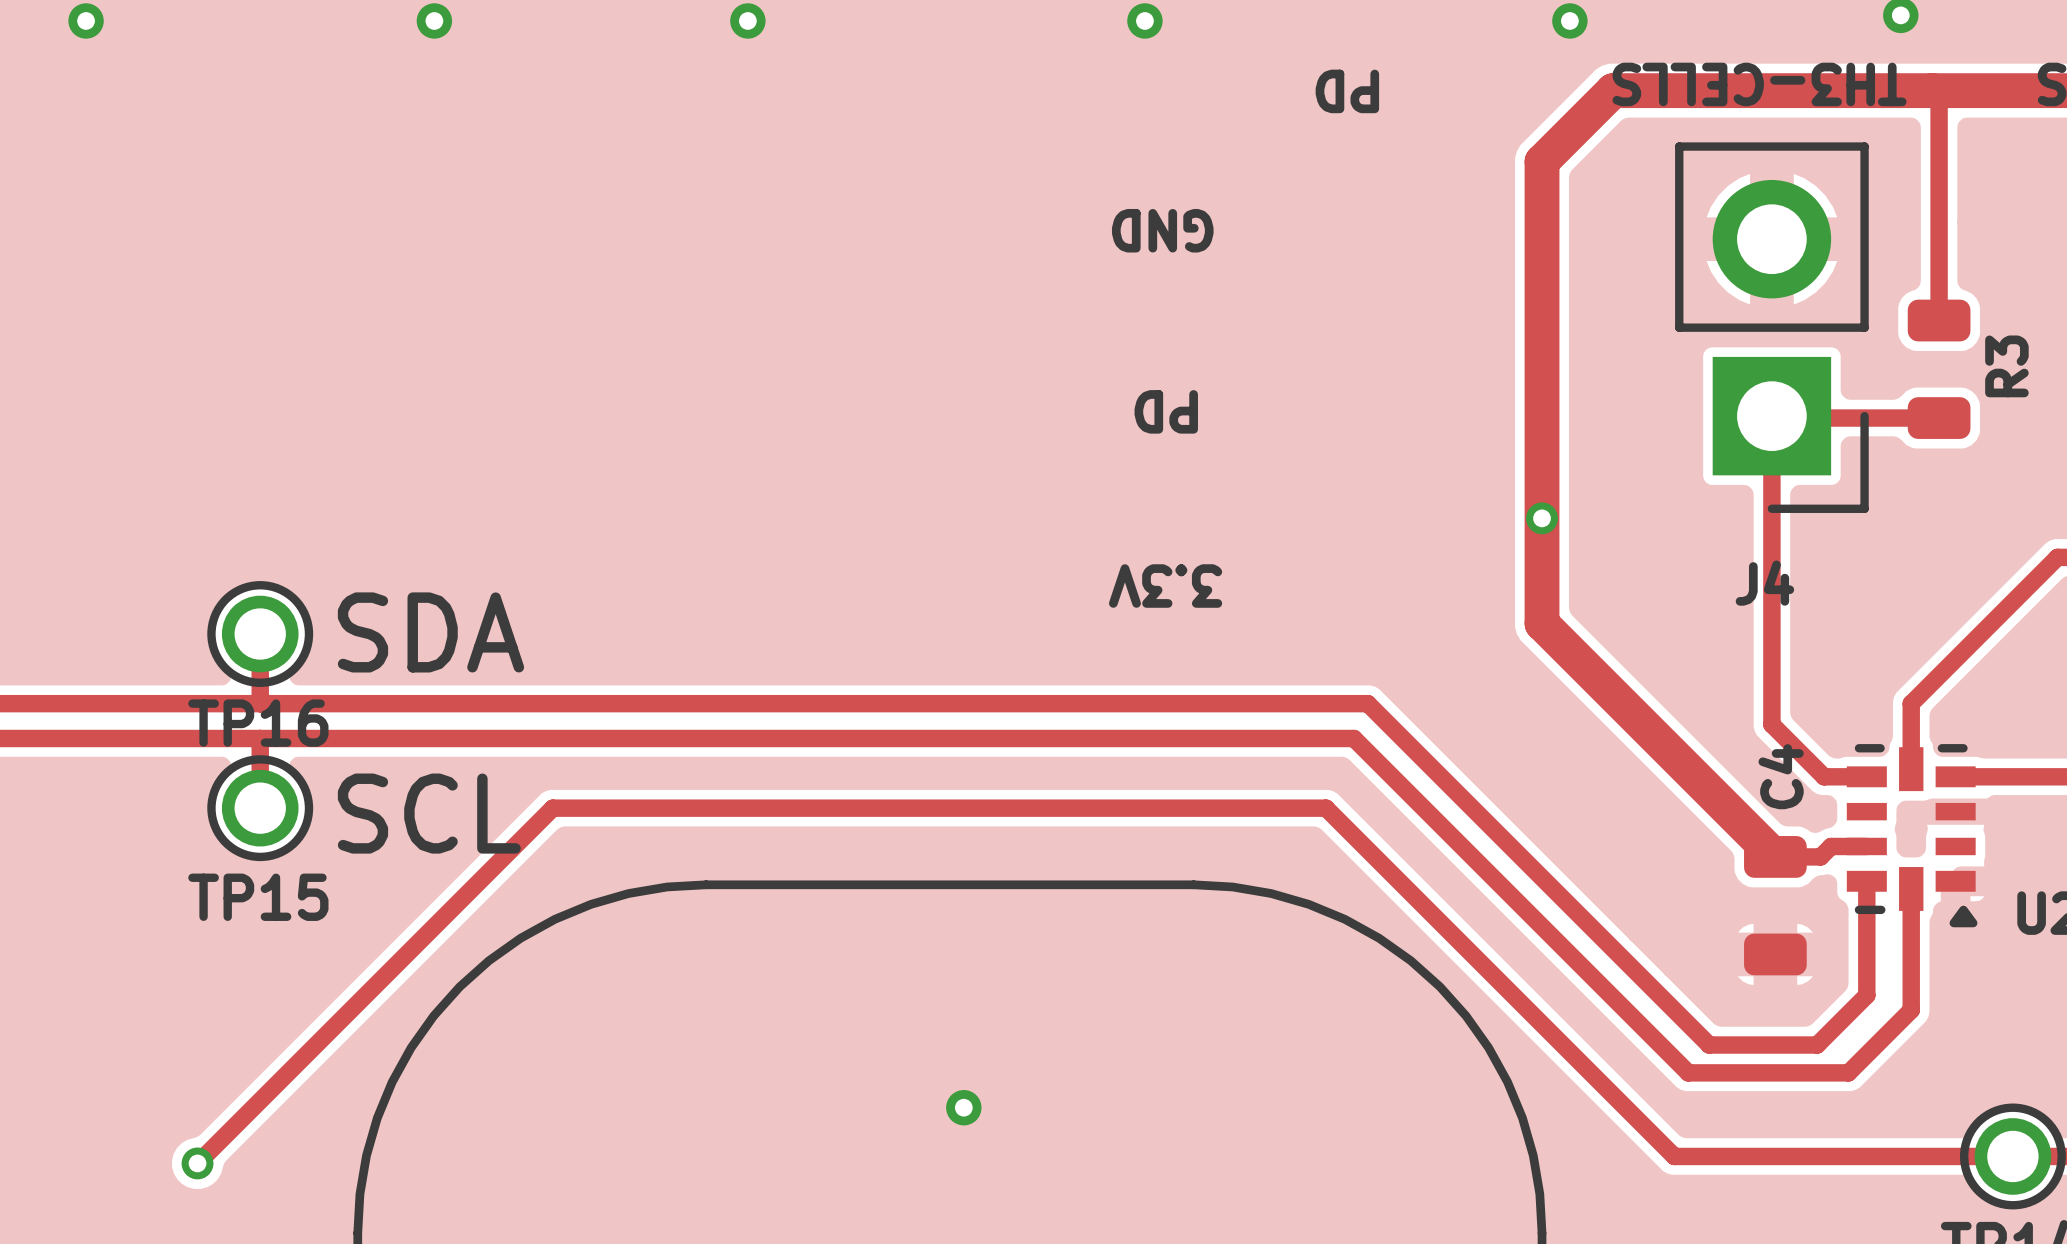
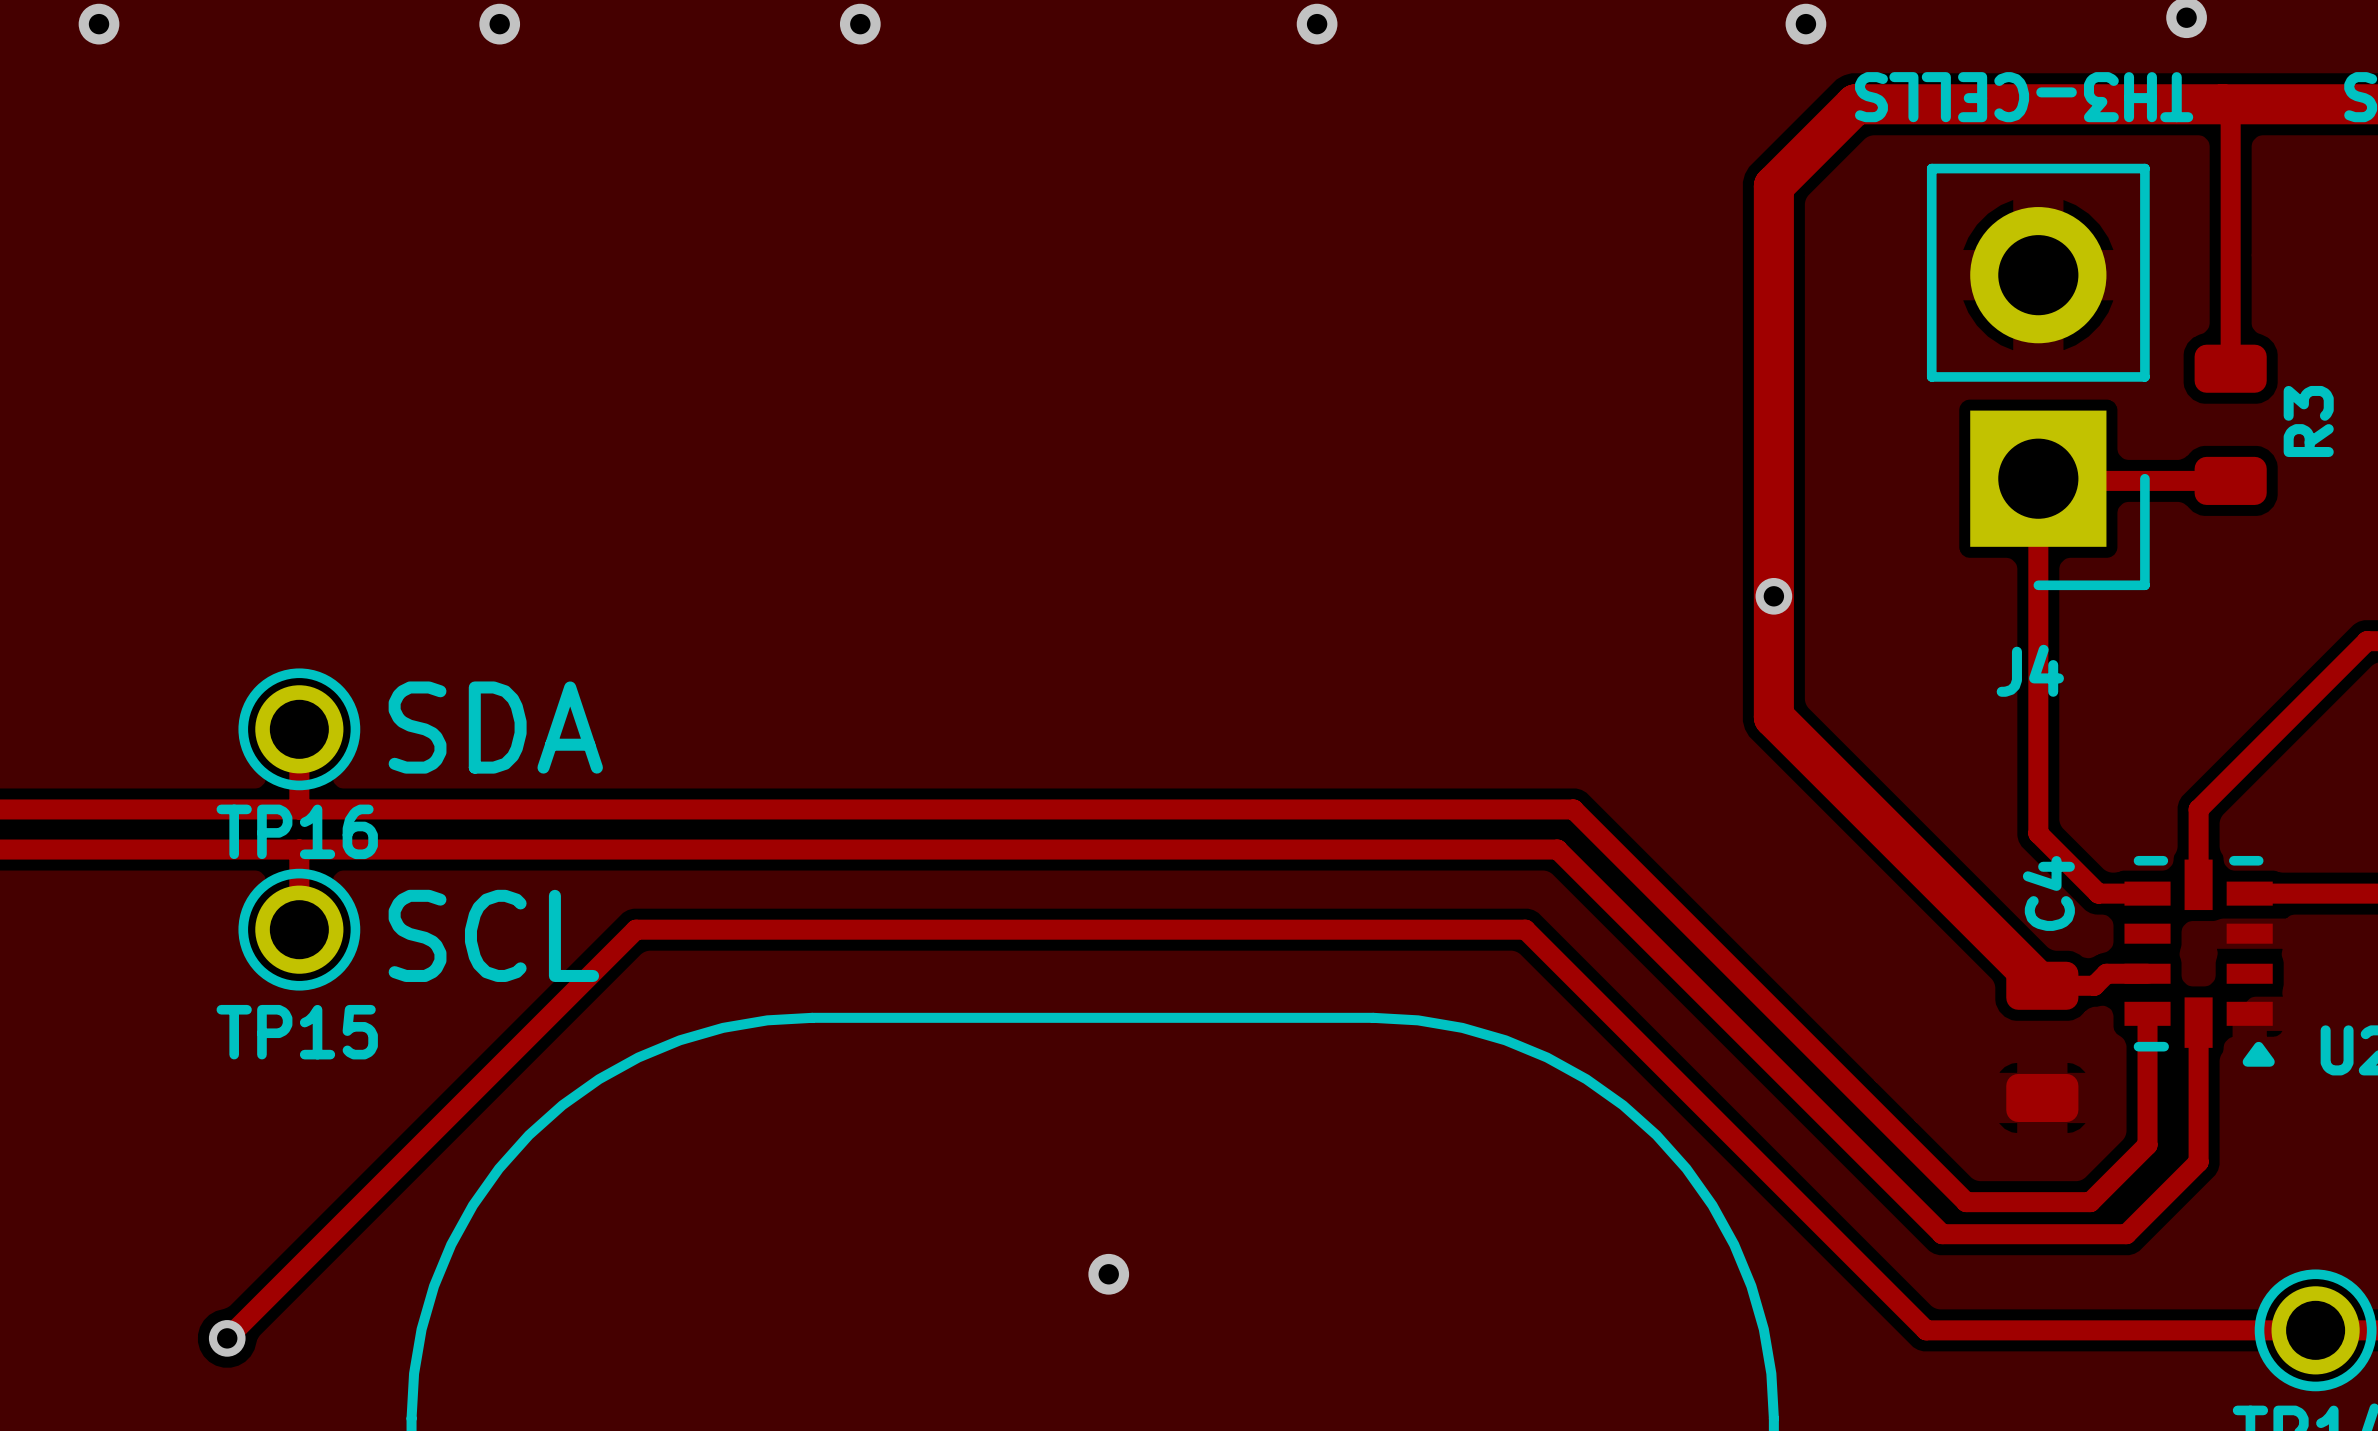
text: PD (1347, 91) -> none
text: GND (1162, 230) -> none
text: PD (1166, 411) -> none
text: 3.3V (1165, 586) -> none

